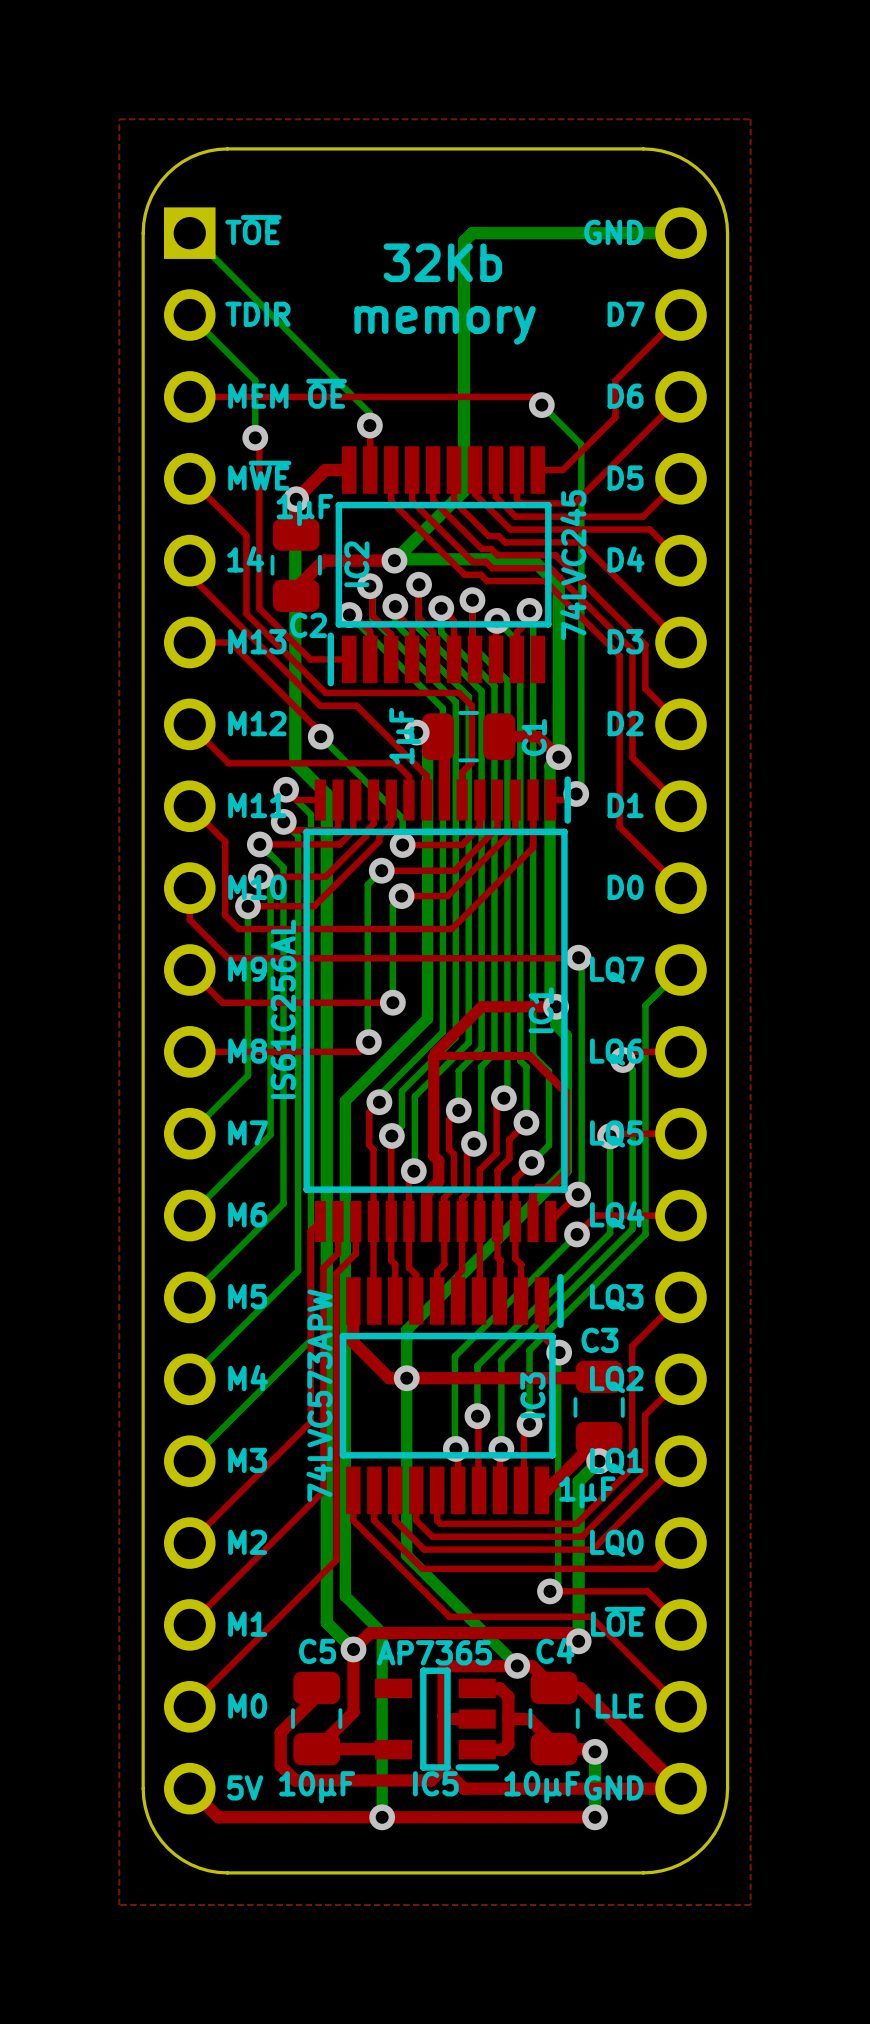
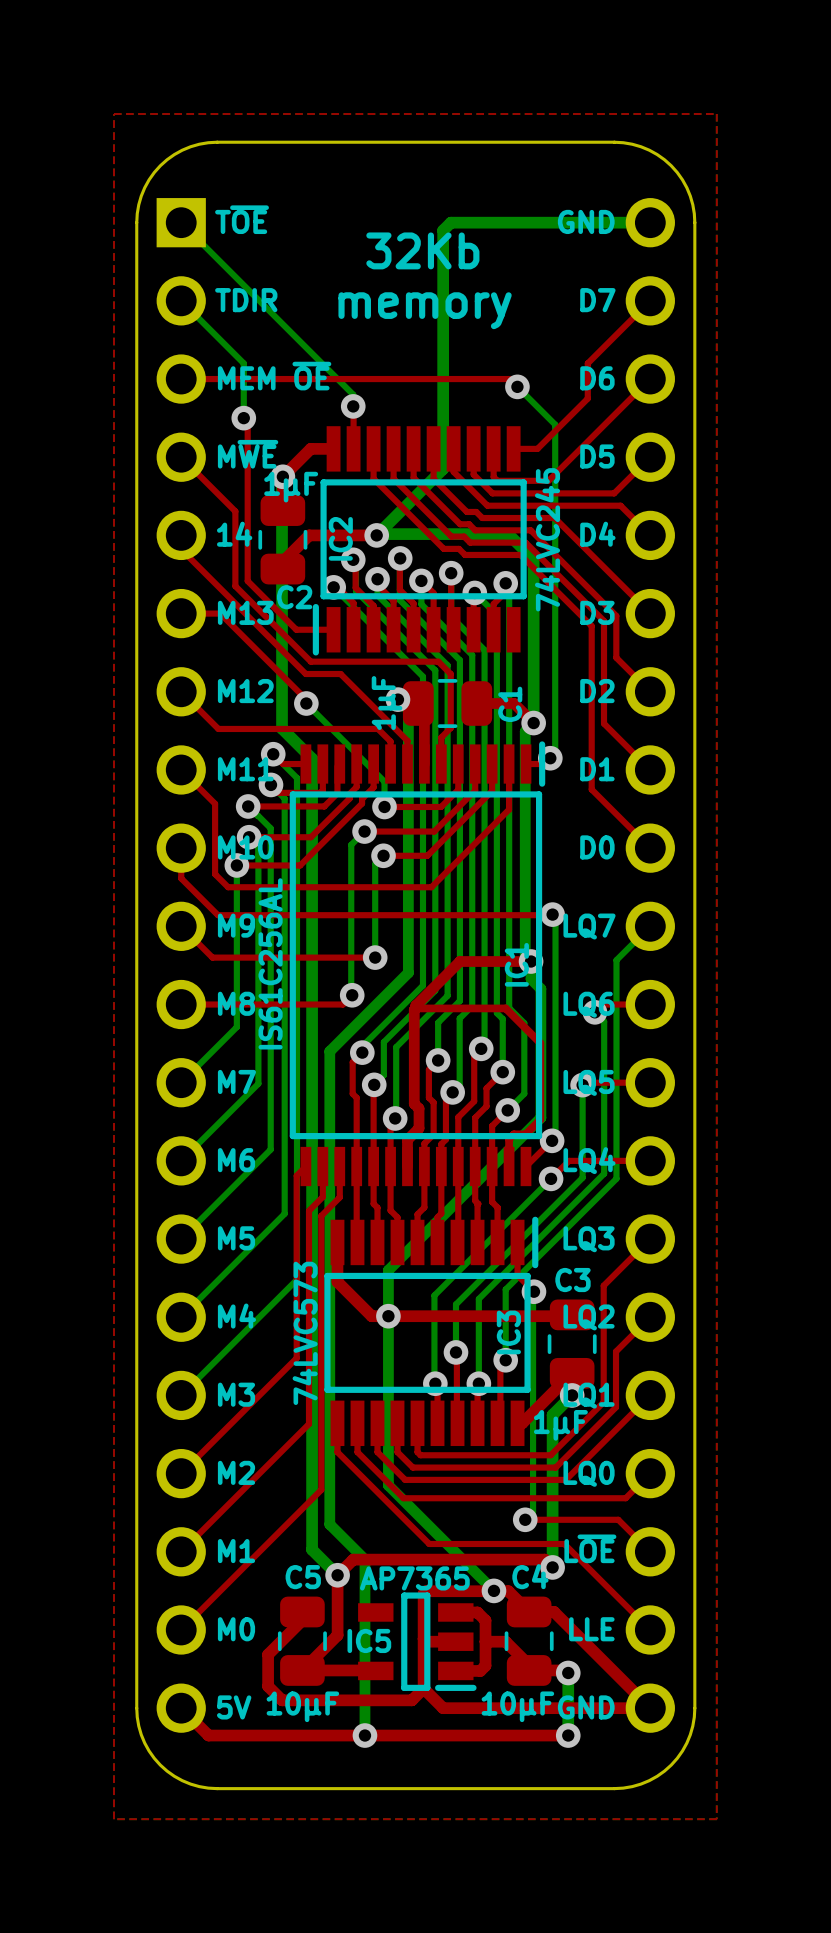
IC3 text: 74LVC573APW (319, 1395) -> 74LVC573 (305, 1333)
IC5 name position: IC5 (435, 1783) -> IC5 (369, 1640)

